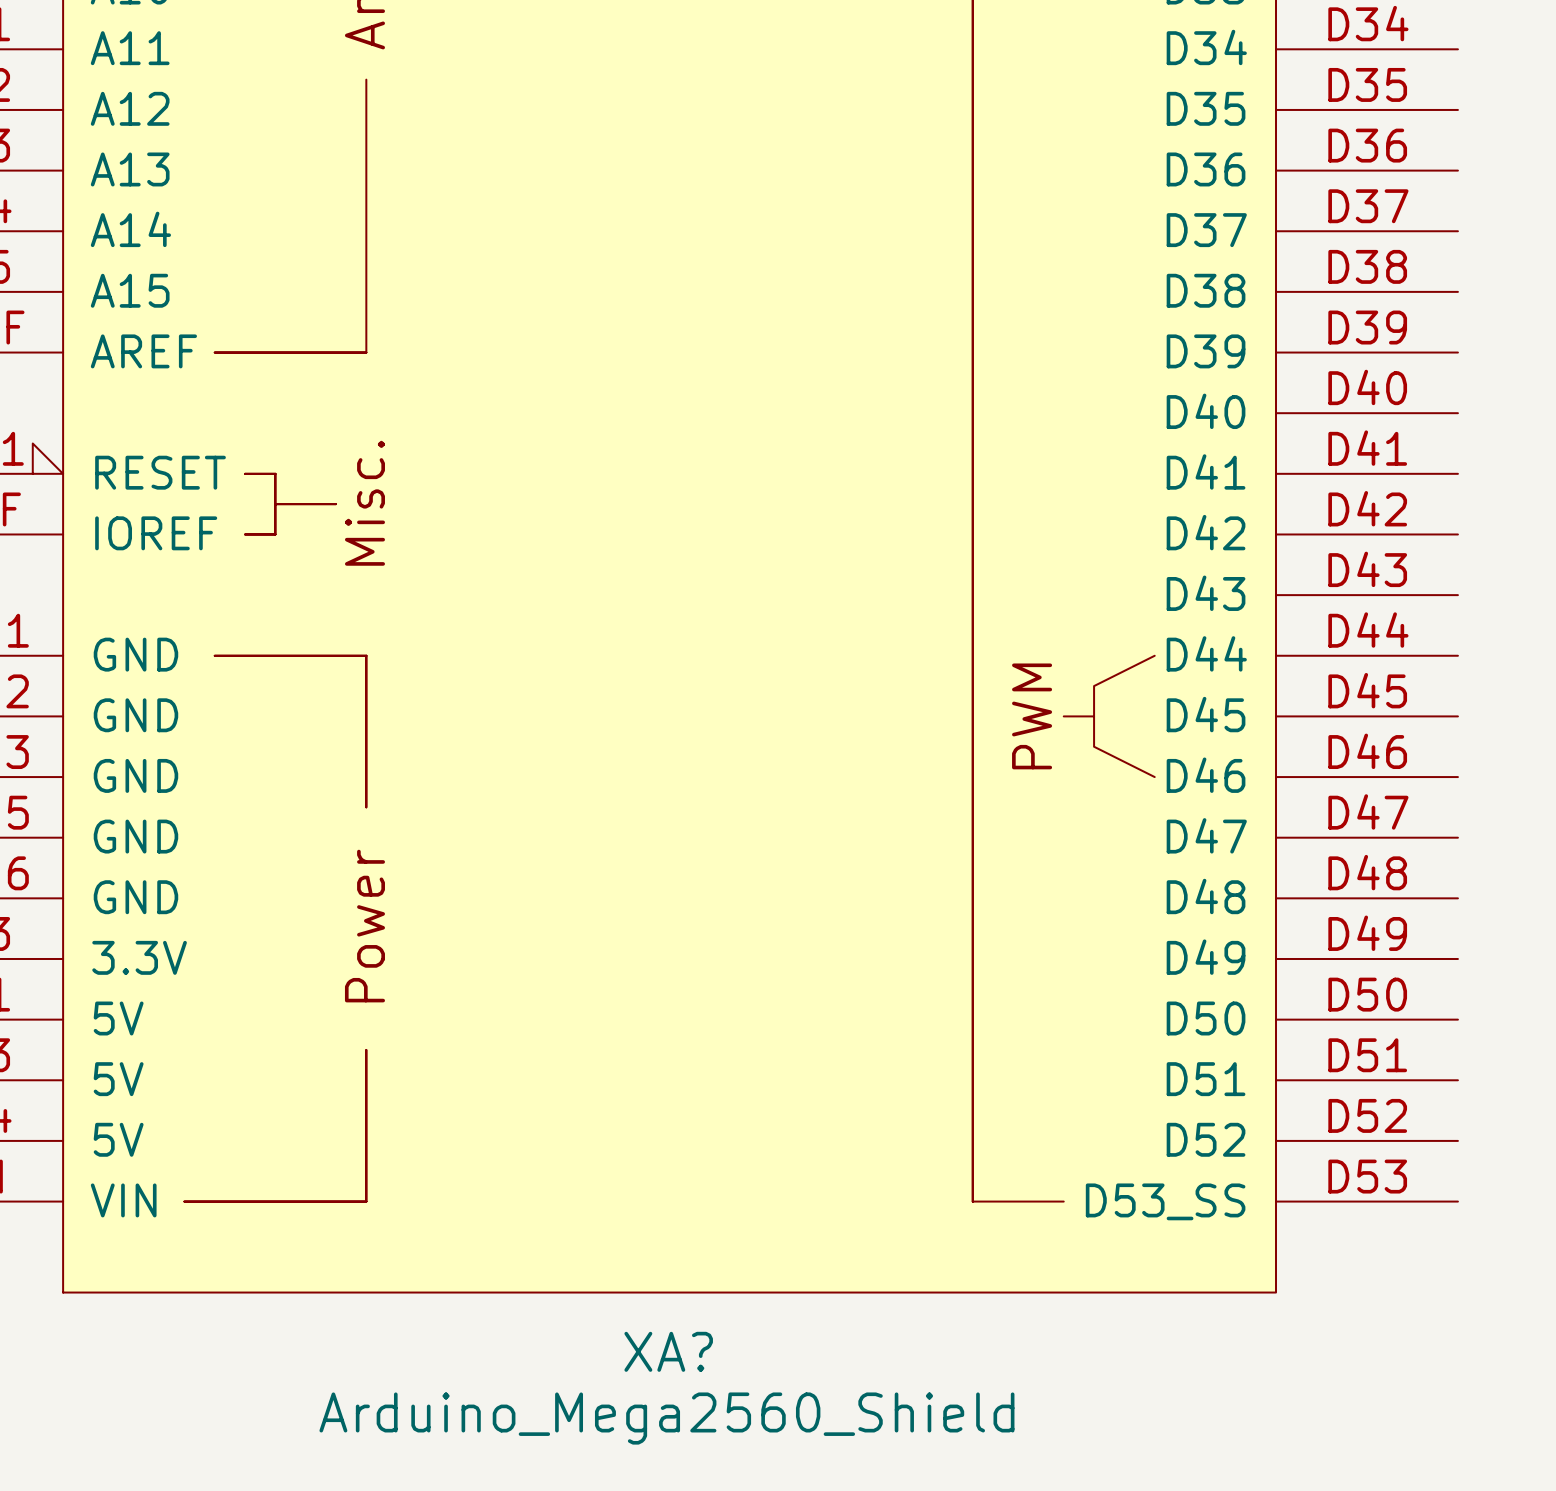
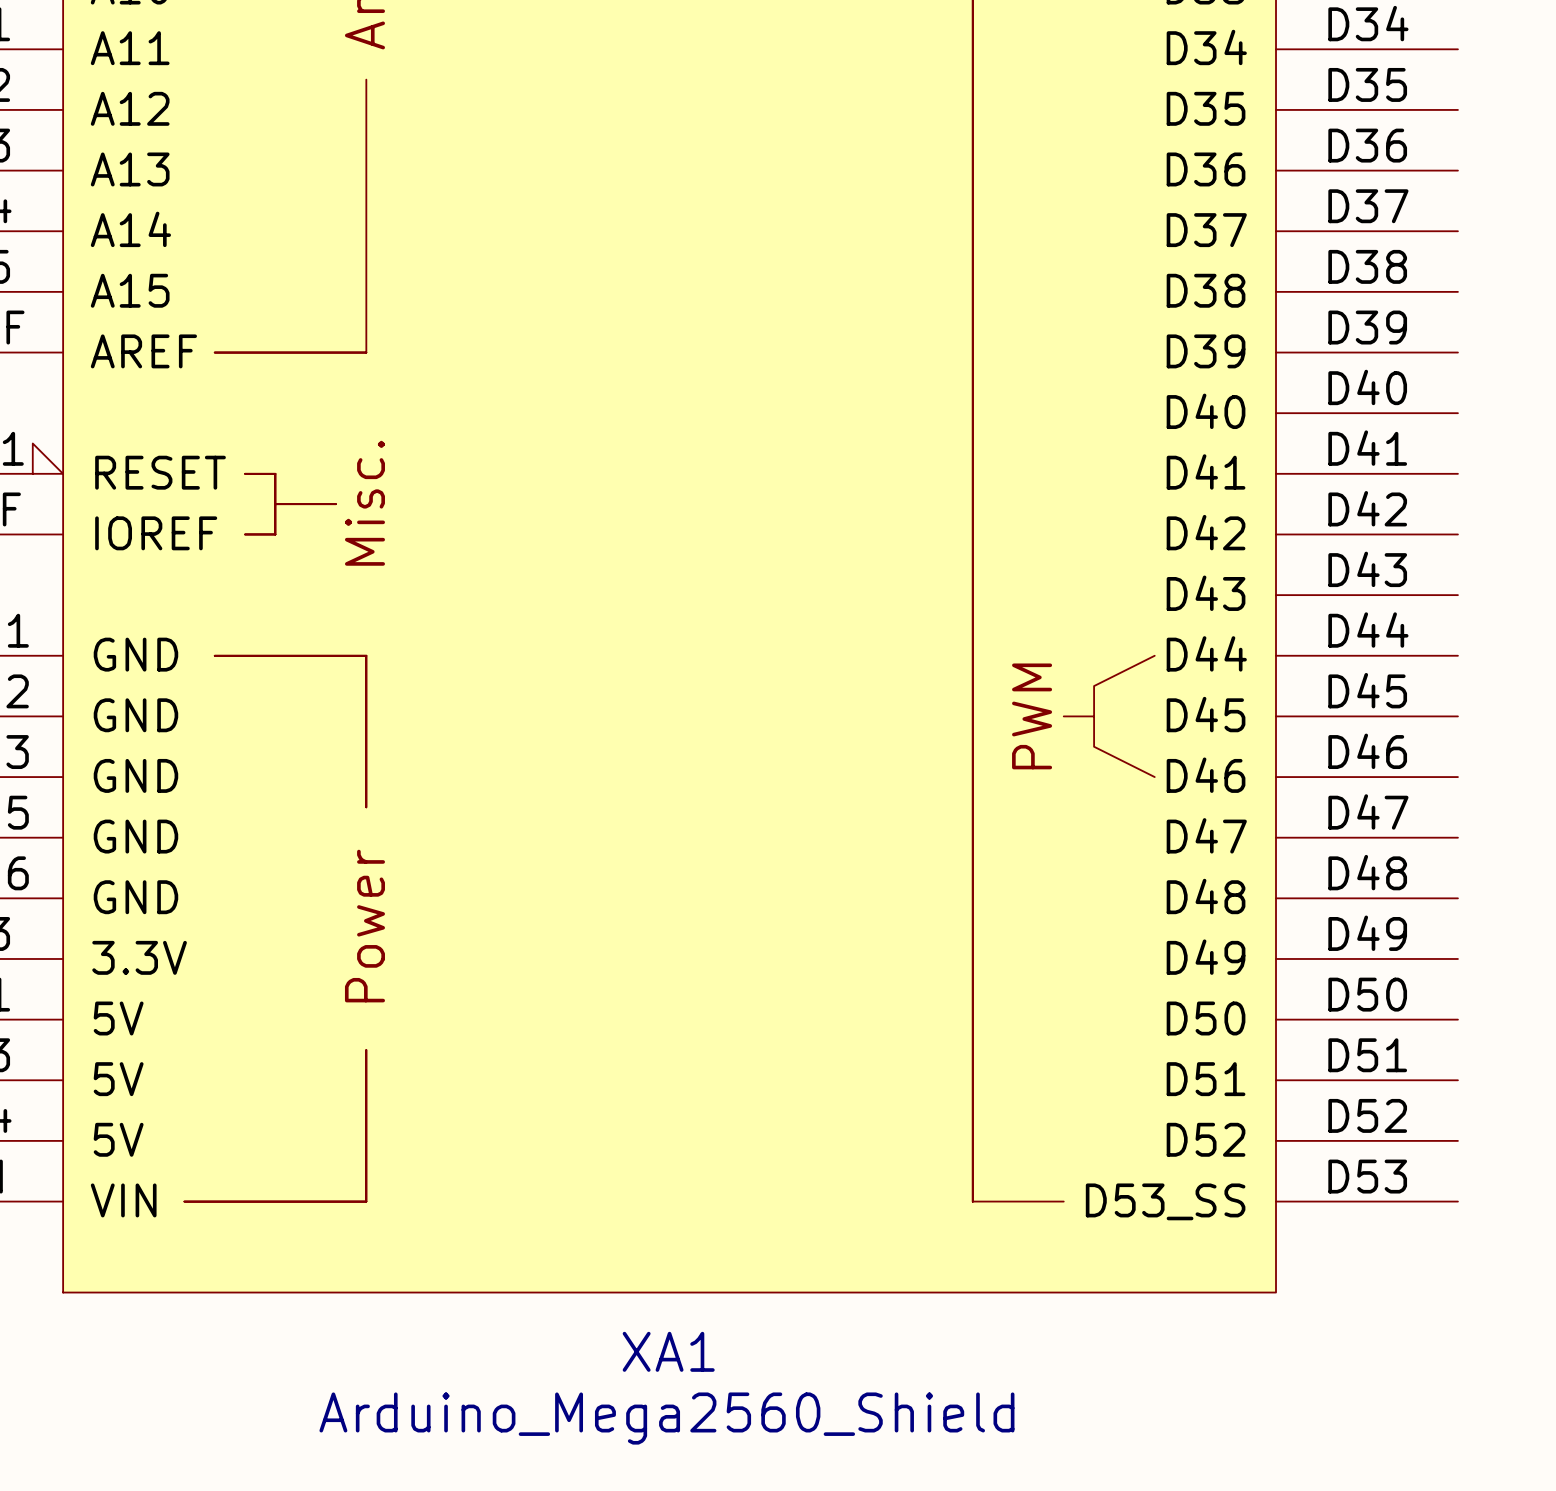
XA? name: XA? (668, 1351) -> XA1 (668, 1351)

